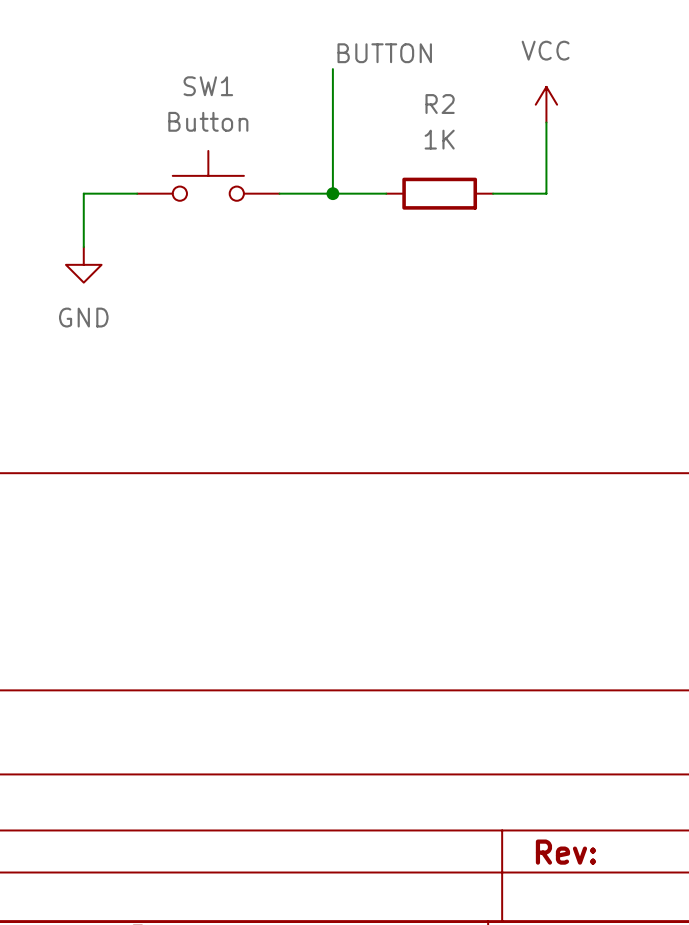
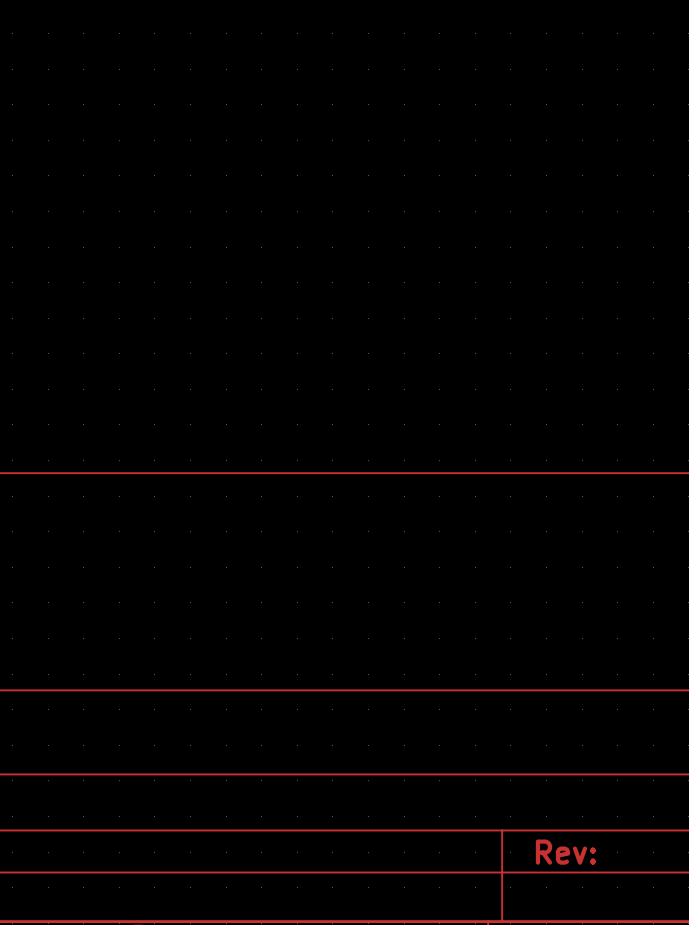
label: BUTTON (384, 53) -> none
wire: (332, 69) (332, 193) -> none
power symbol: VCC (546, 104) -> none
wire: (546, 122) (546, 193) (493, 193) -> none
SW1: Button (208, 175) -> none
wire: (137, 193) (83, 193) (83, 247) -> none
wire: (279, 193) (386, 193) -> none
junction: (332, 193) -> none
R2: 1K (439, 193) -> none
power symbol: GND (83, 264) -> none

